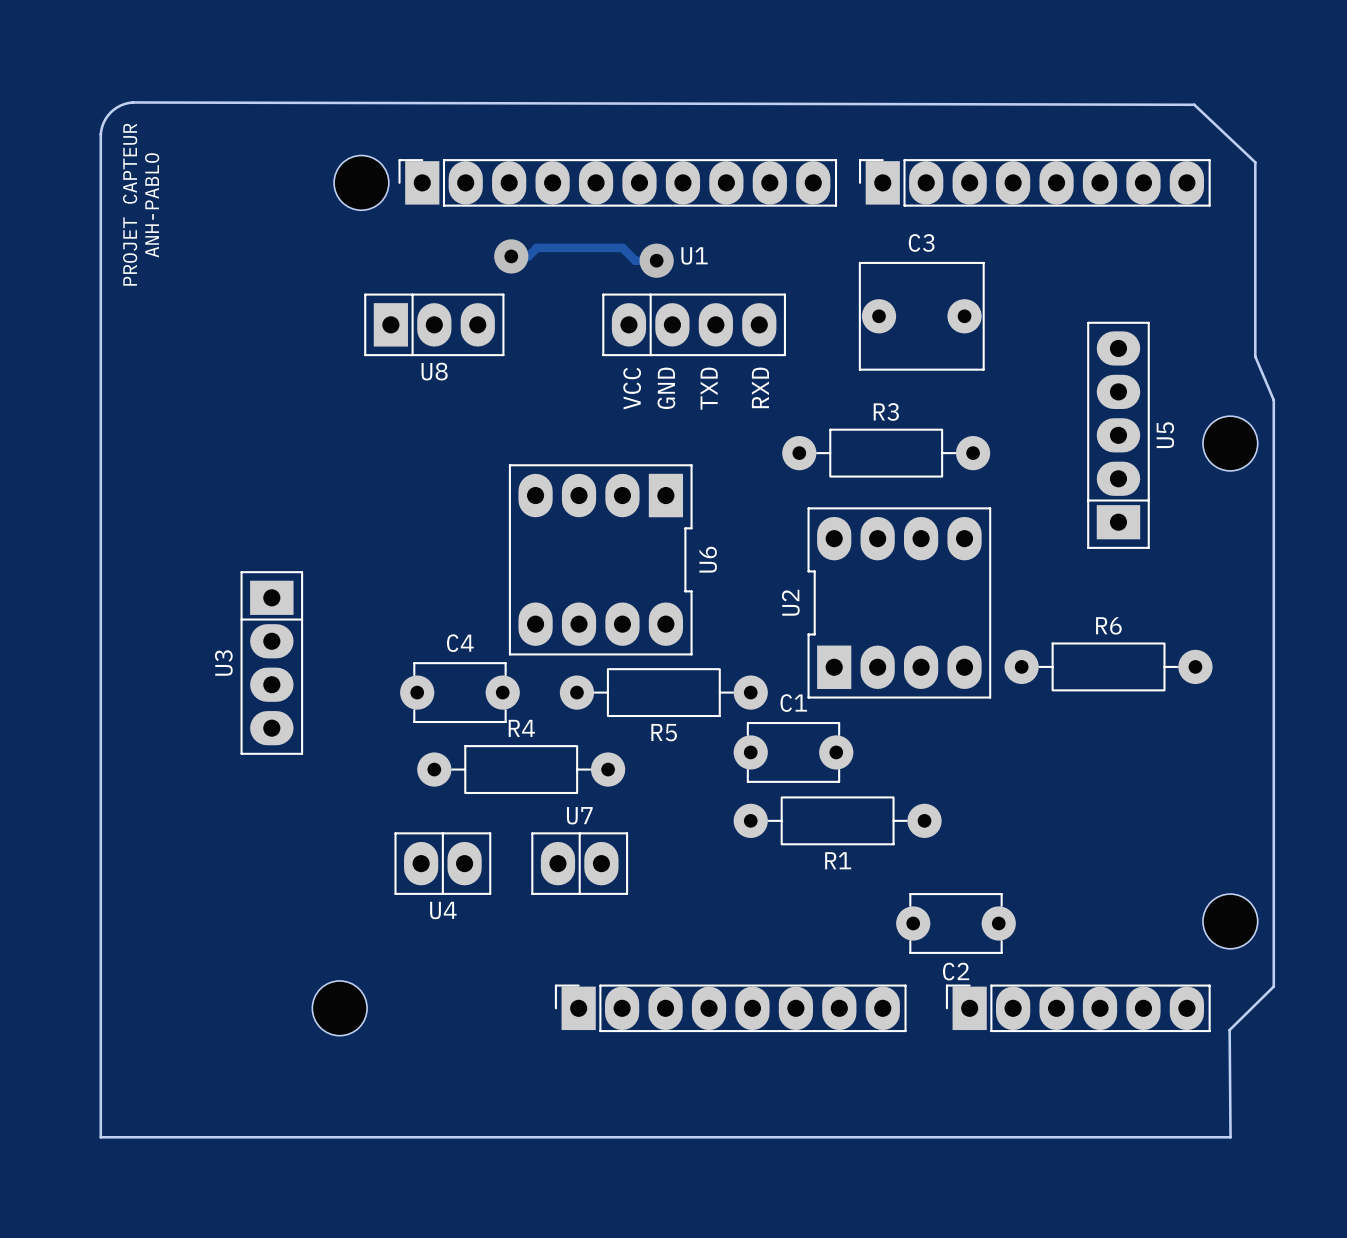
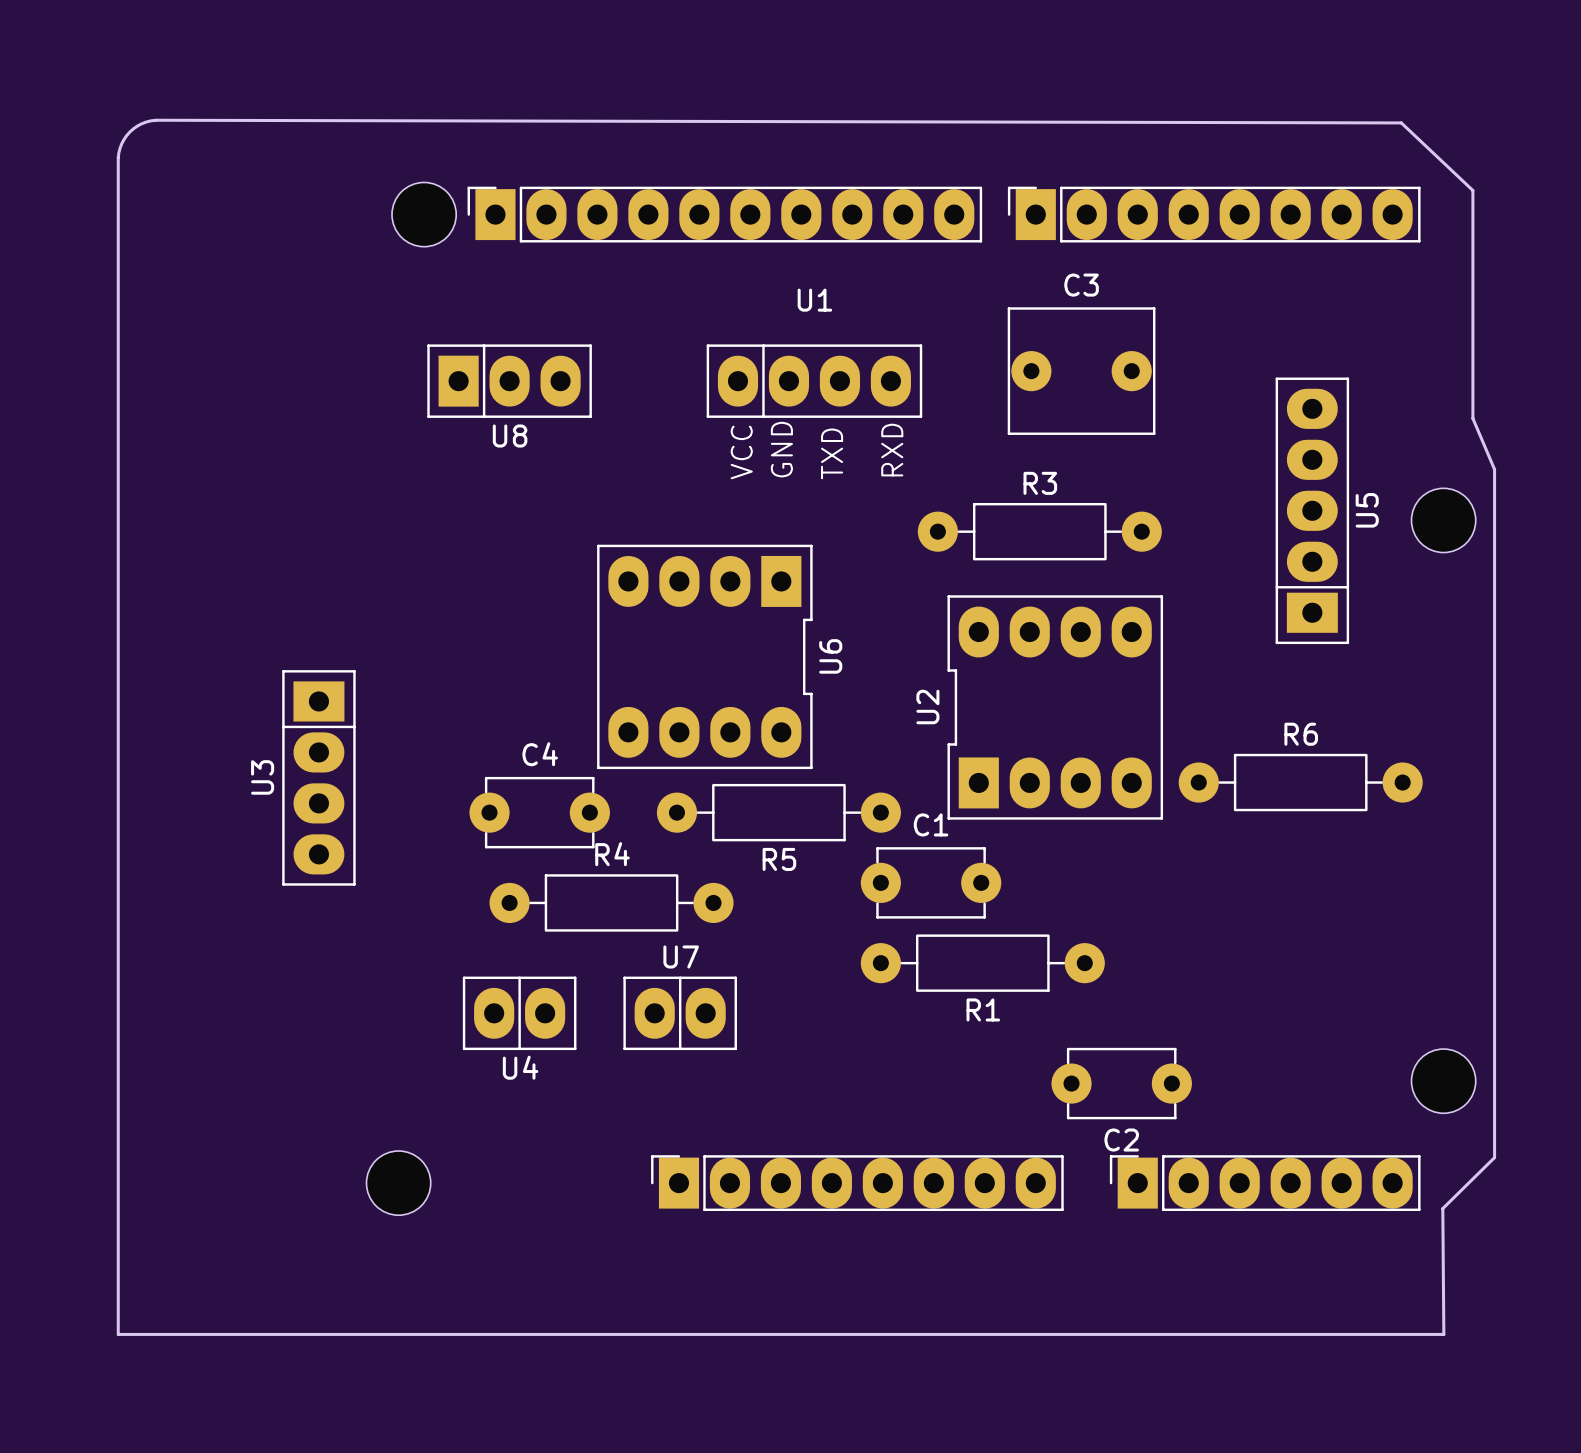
text: PROJET CAPTEUR (130, 204) -> none
text: ANH-PABLO (152, 205) -> none
track: (511, 256) (528, 256) (536, 247) (622, 247) (635, 260) (656, 260) -> none
via: (511, 256) -> none
via: (656, 260) -> none

